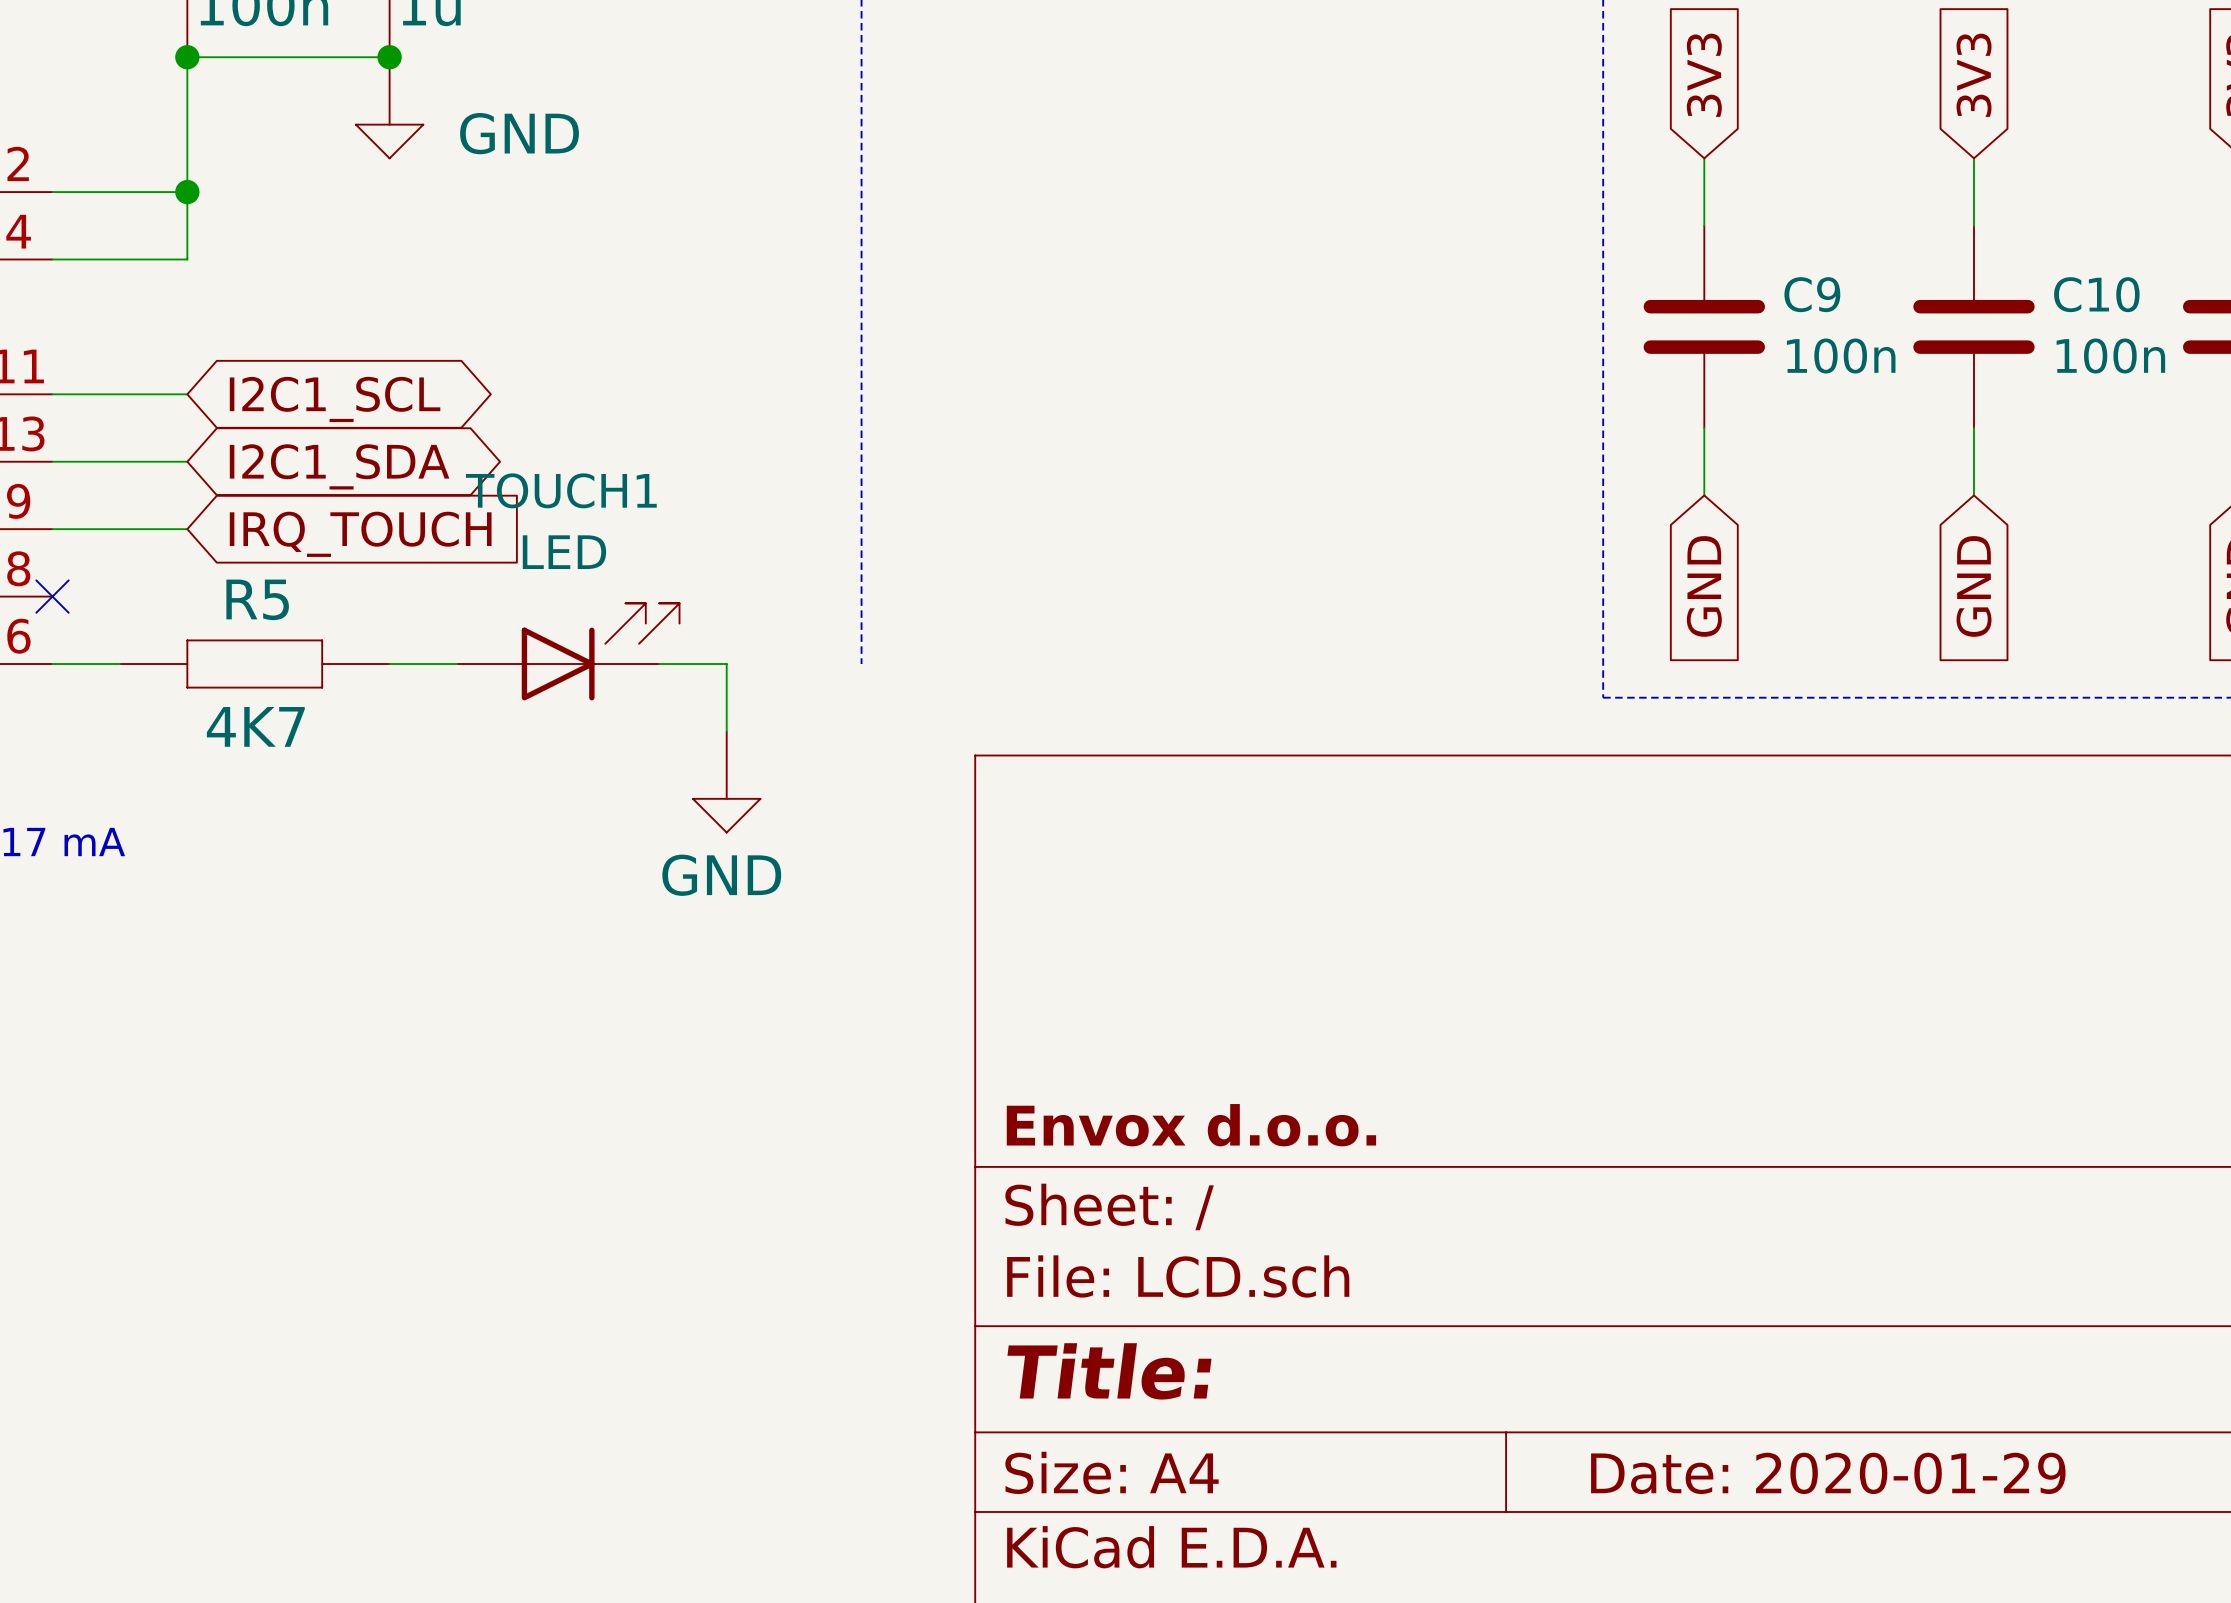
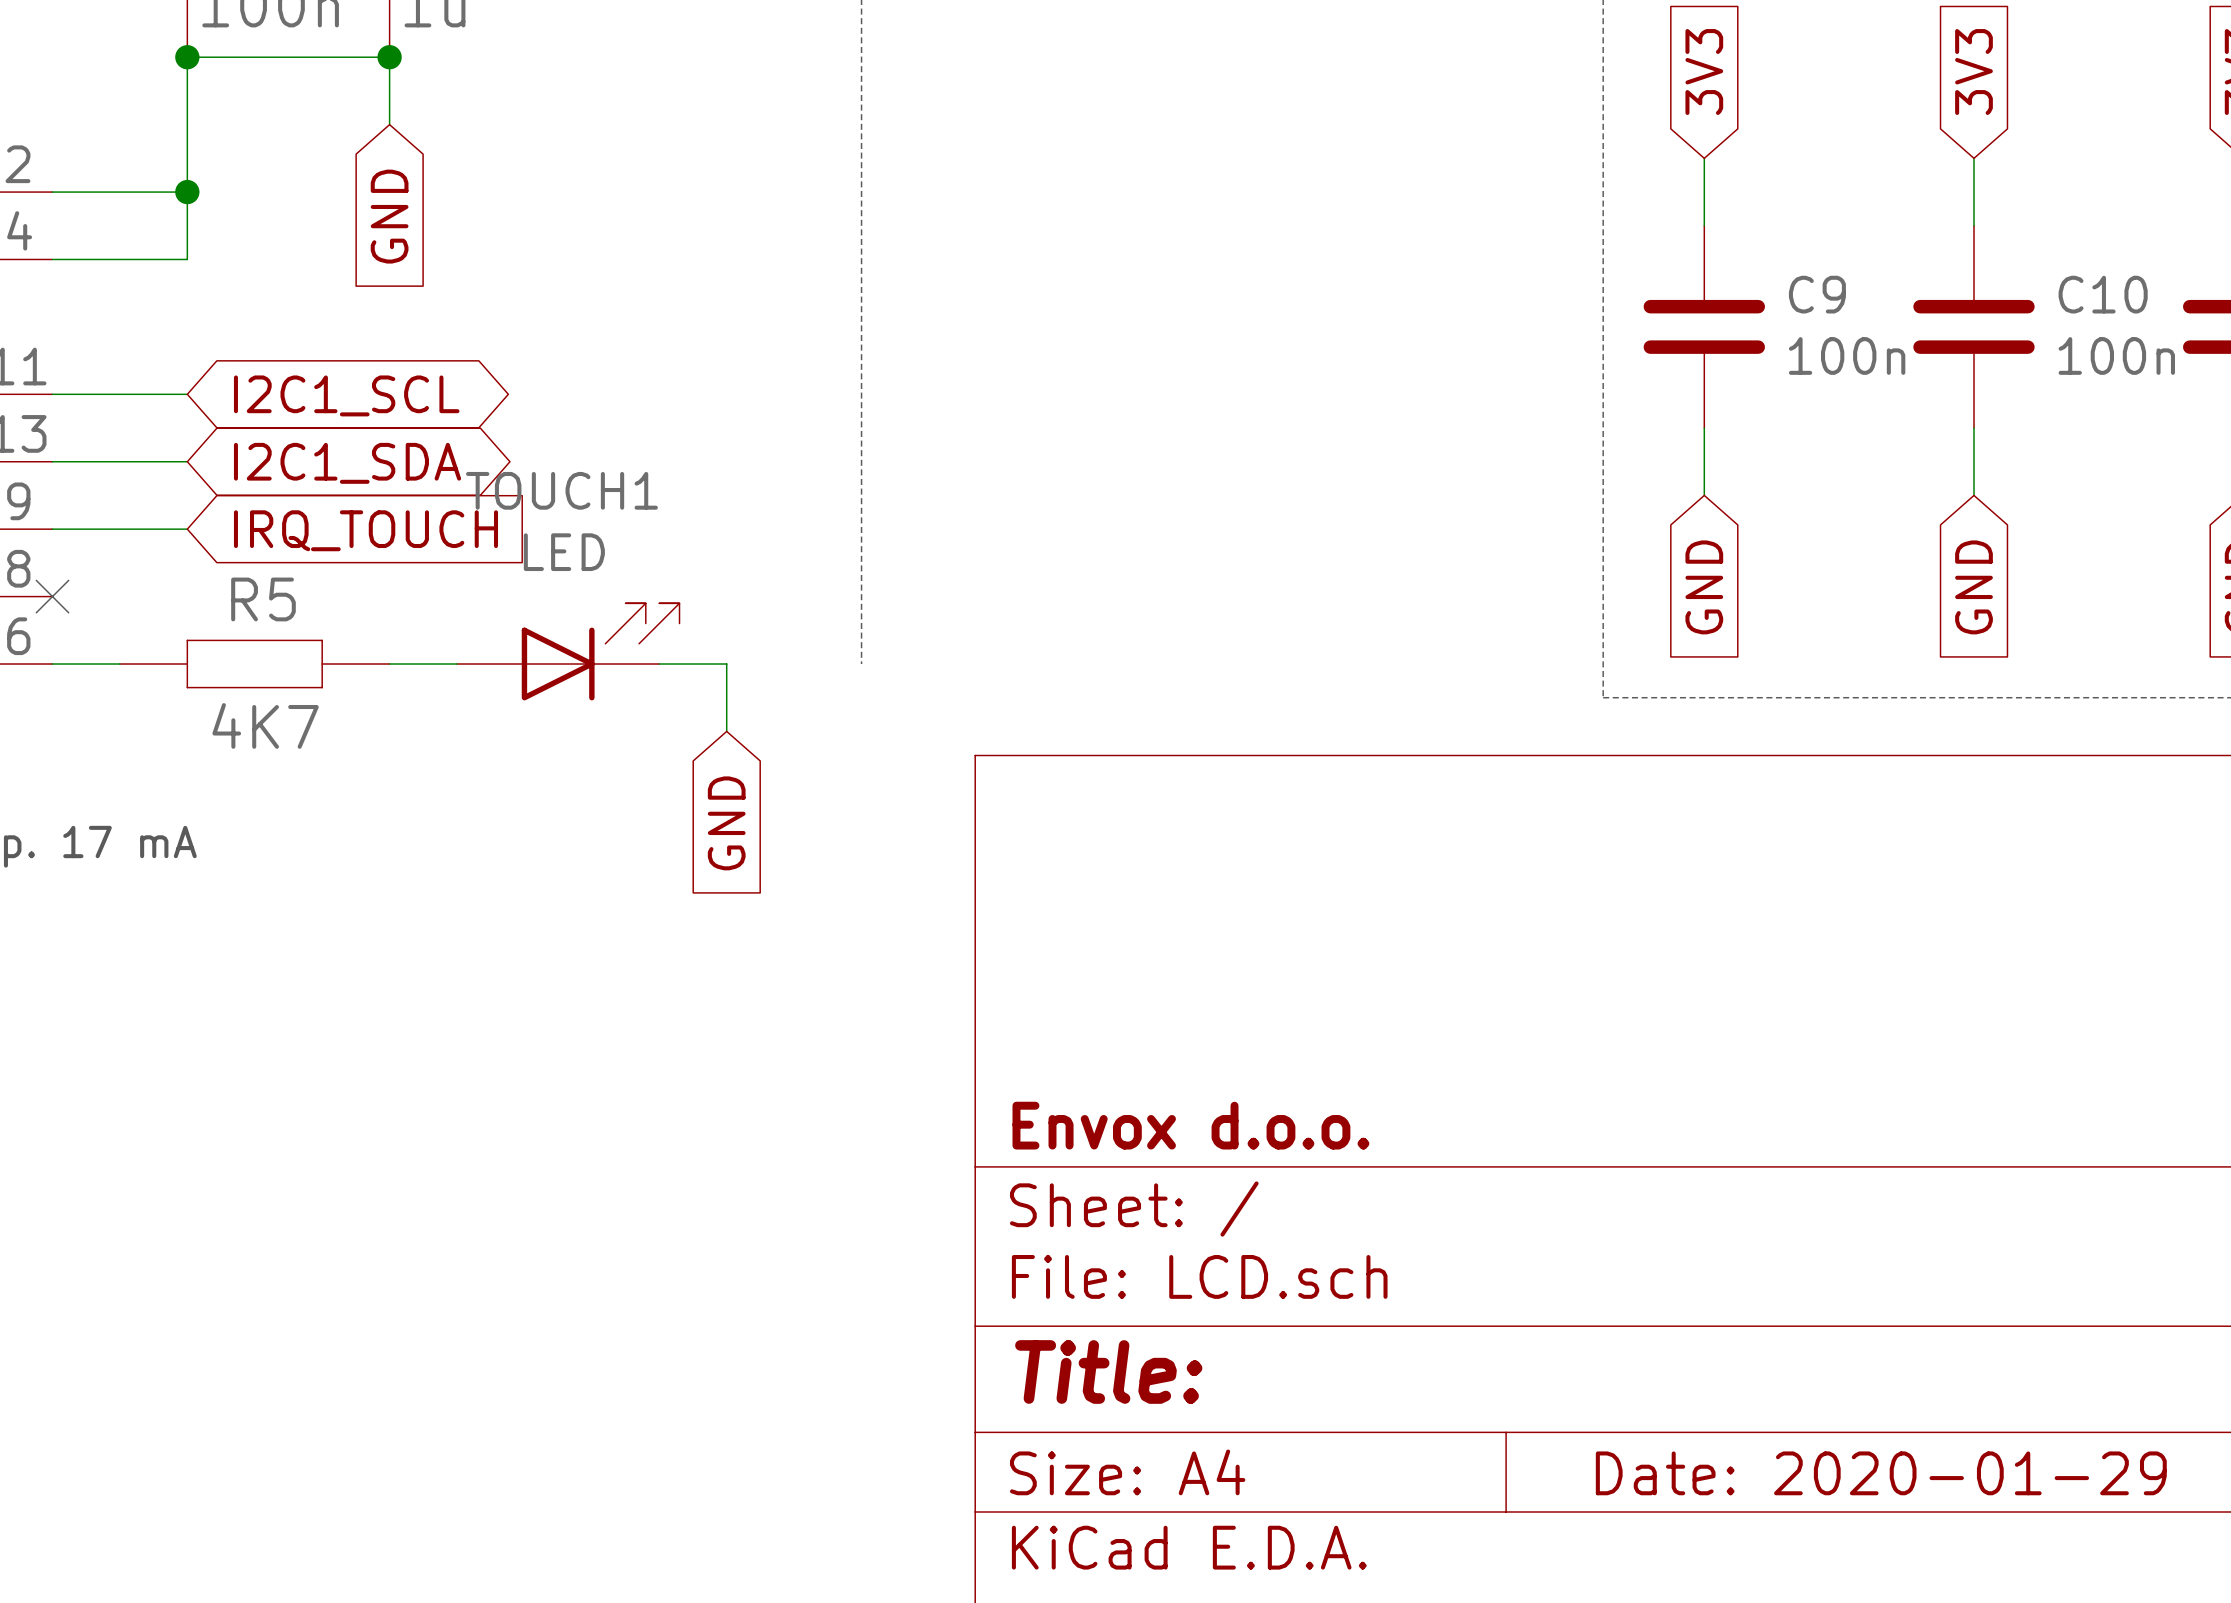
power symbol: GND (389, 107) -> none
global label: none -> GND (389, 216)
power symbol: GND (726, 781) -> none
global label: none -> GND (726, 823)

